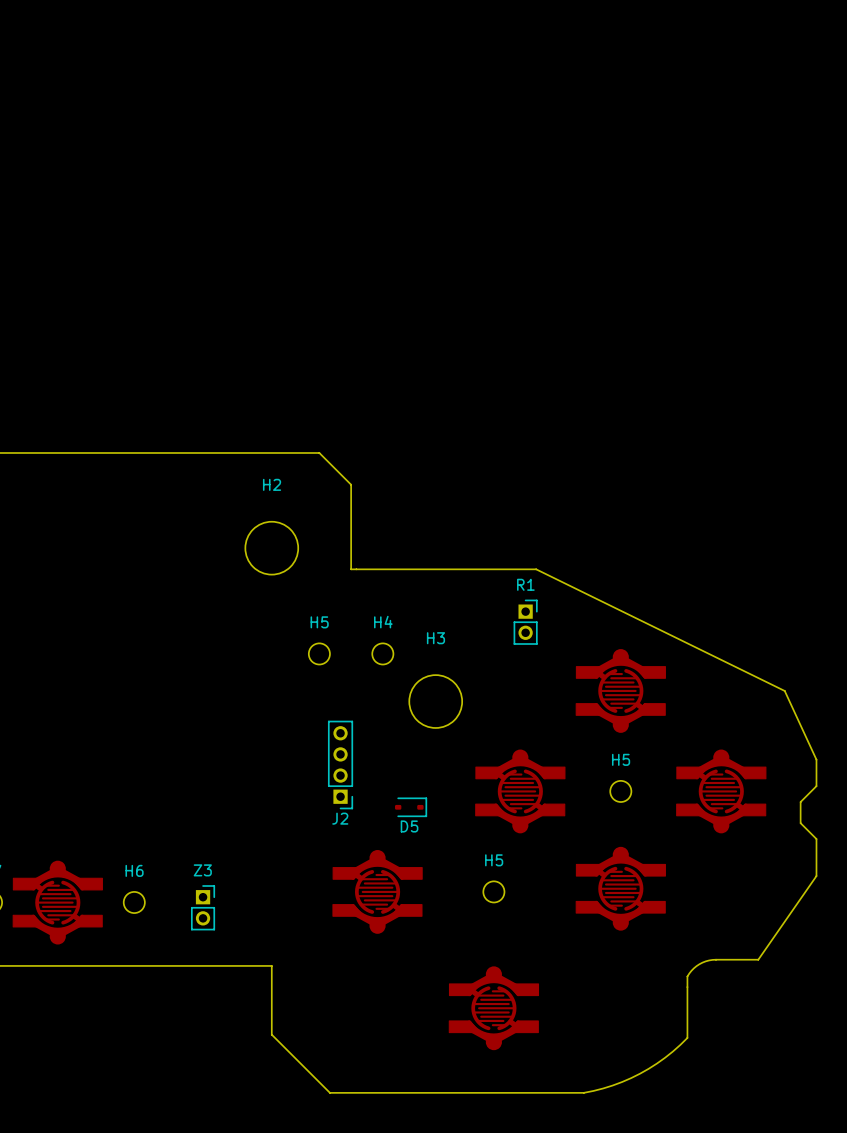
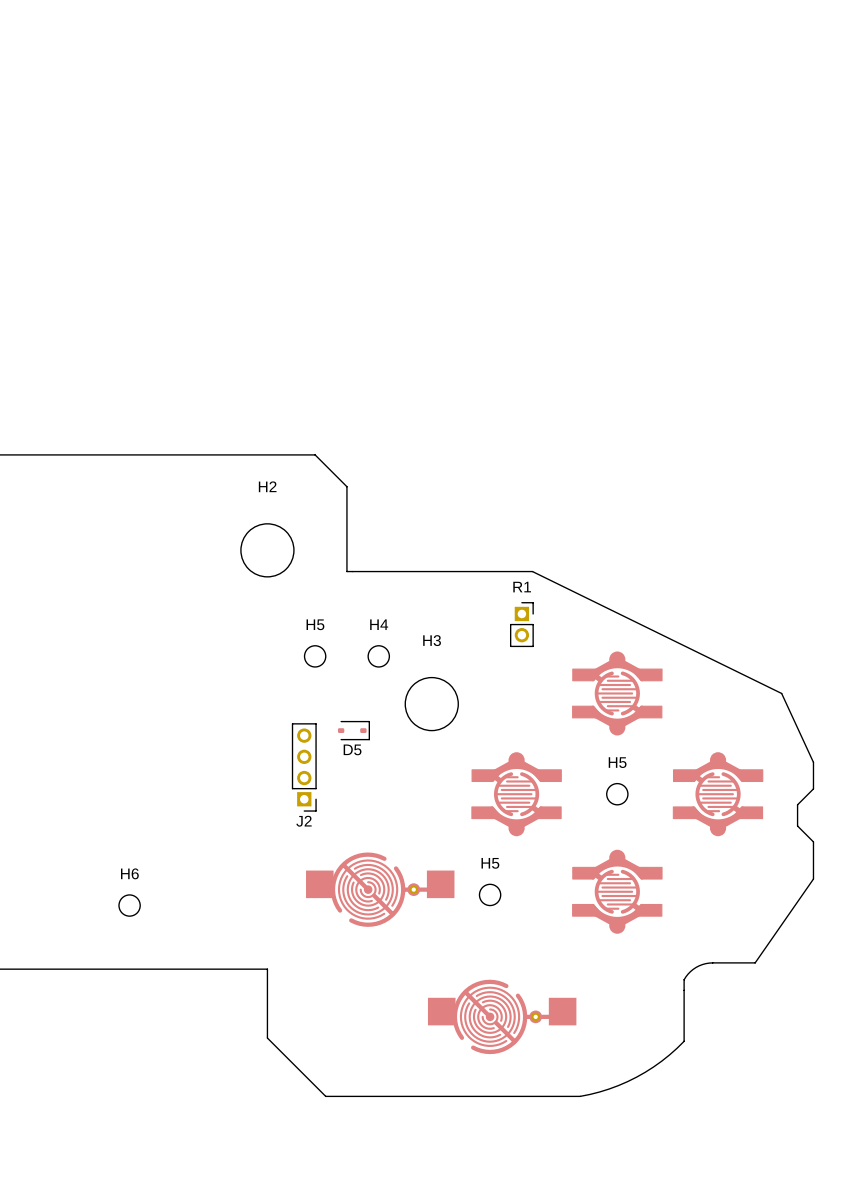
J2 position: (340, 765) -> (304, 767)
D5 position: (410, 807) -> (353, 730)
part footprint: [332, 850, 423, 934] -> [306, 852, 455, 927]
part: (57, 902) -> none
Z3: (203, 907) -> none
part: (493, 1008) -> none
part: none -> (502, 1016)

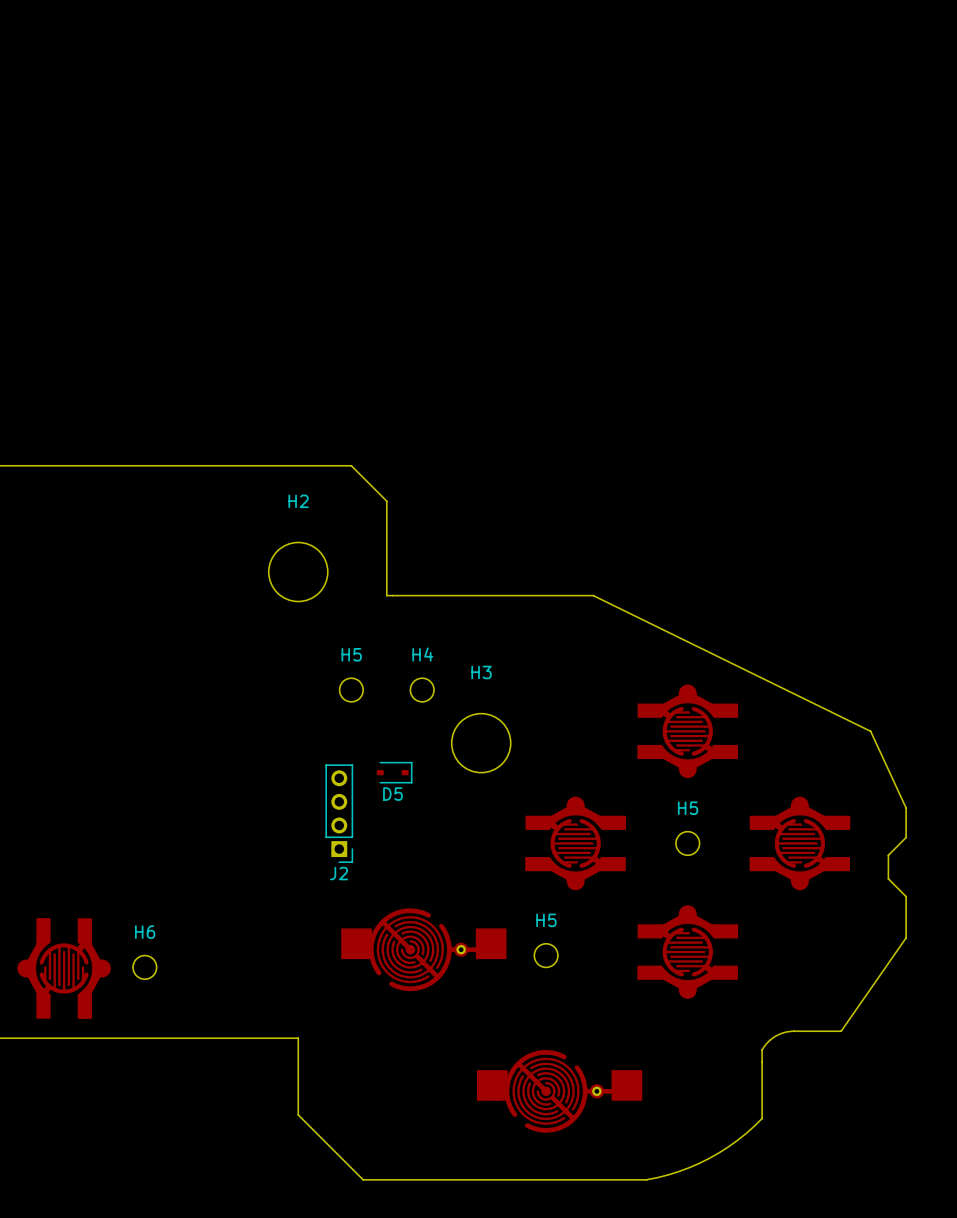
R1: (521, 624) -> none
part: none -> (64, 968)

